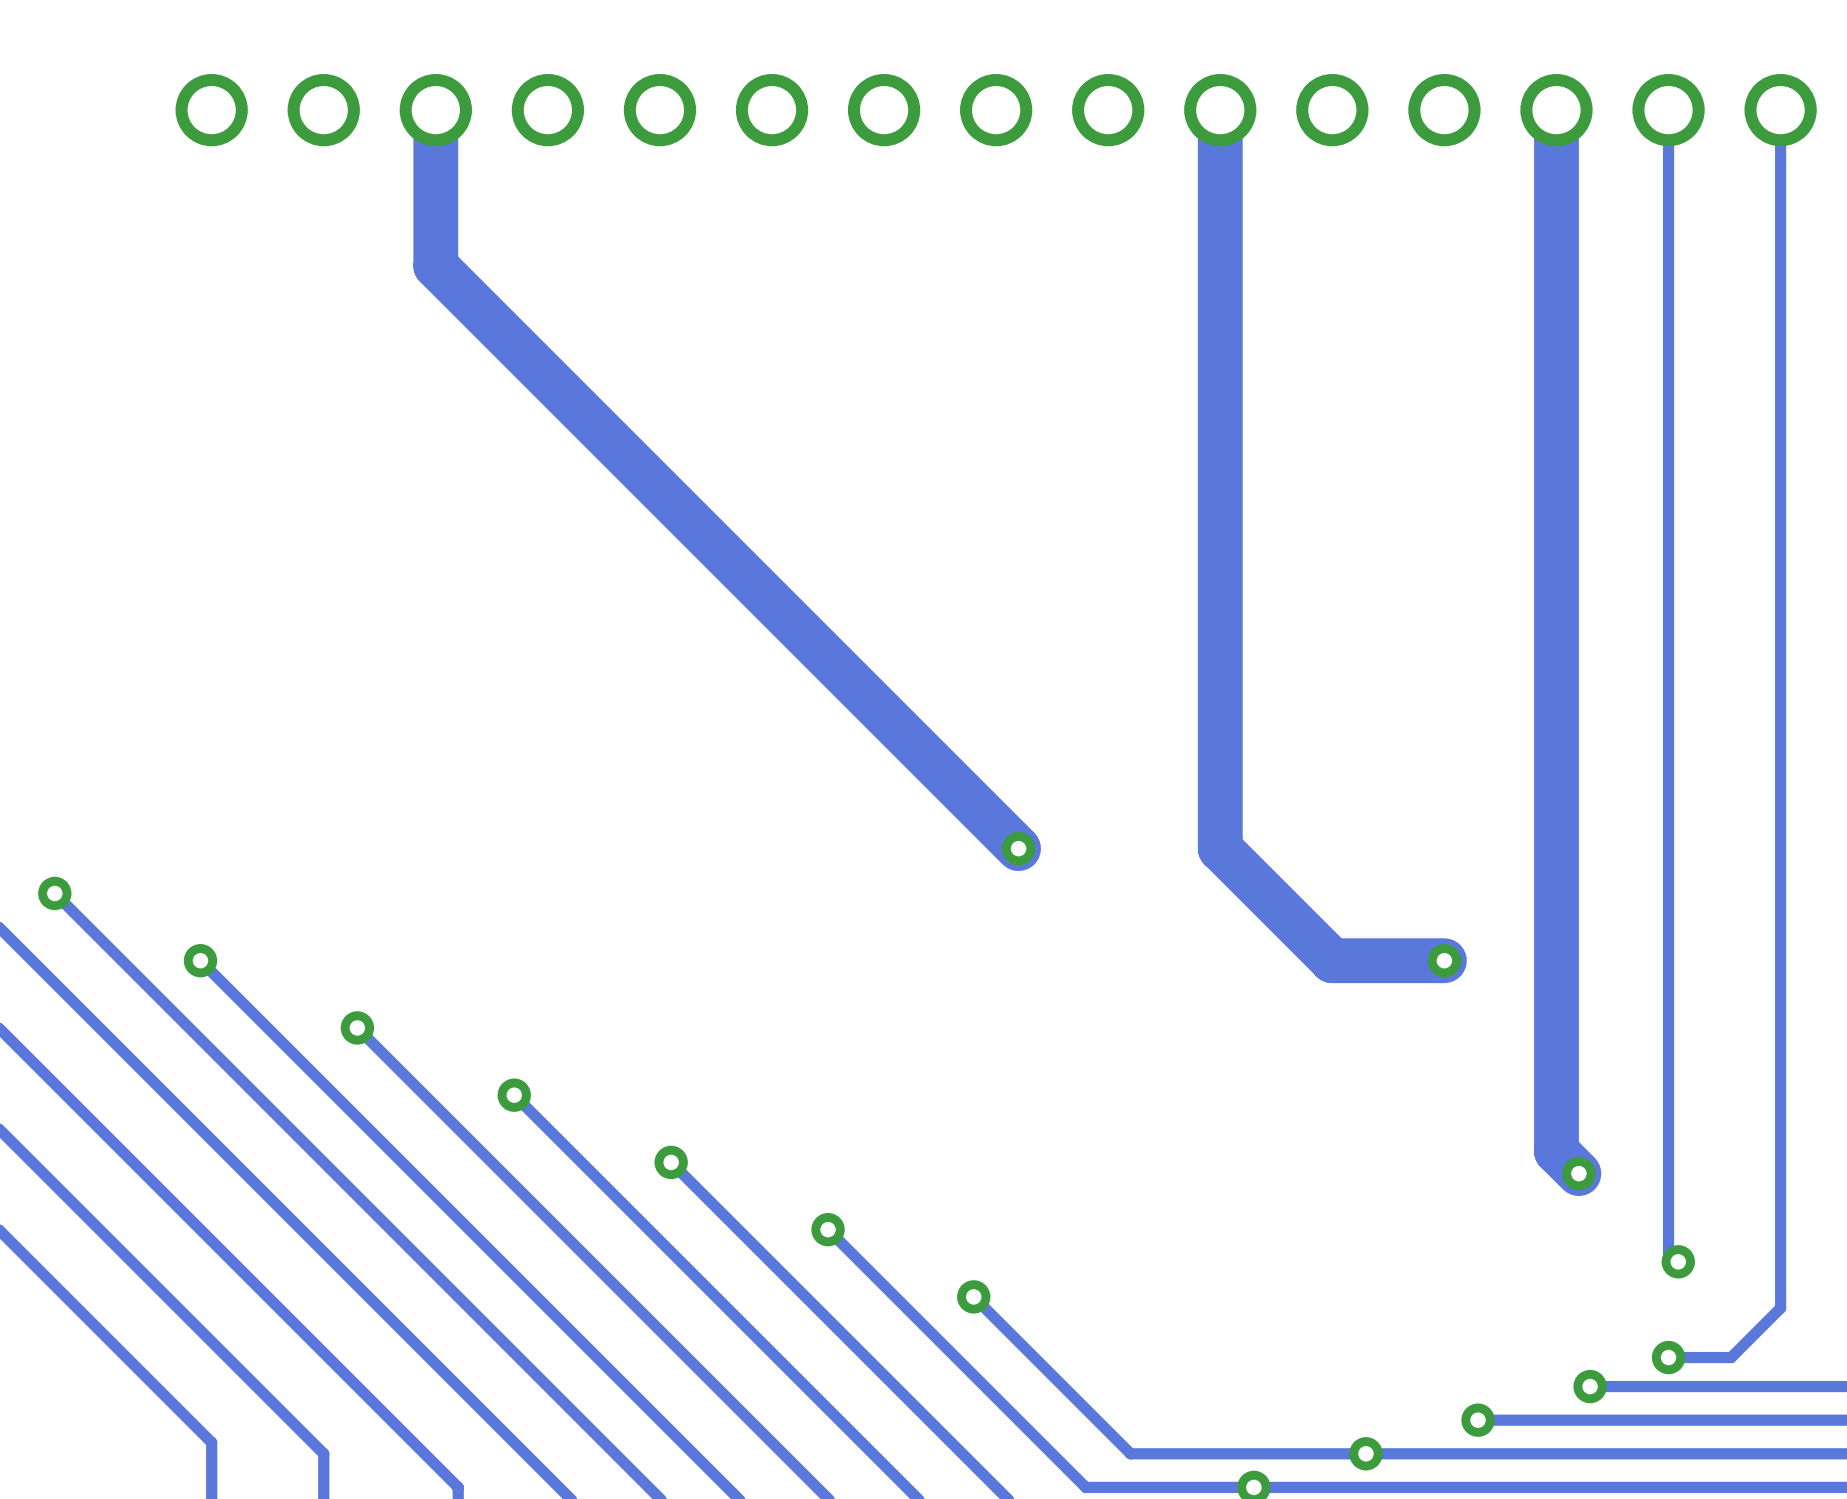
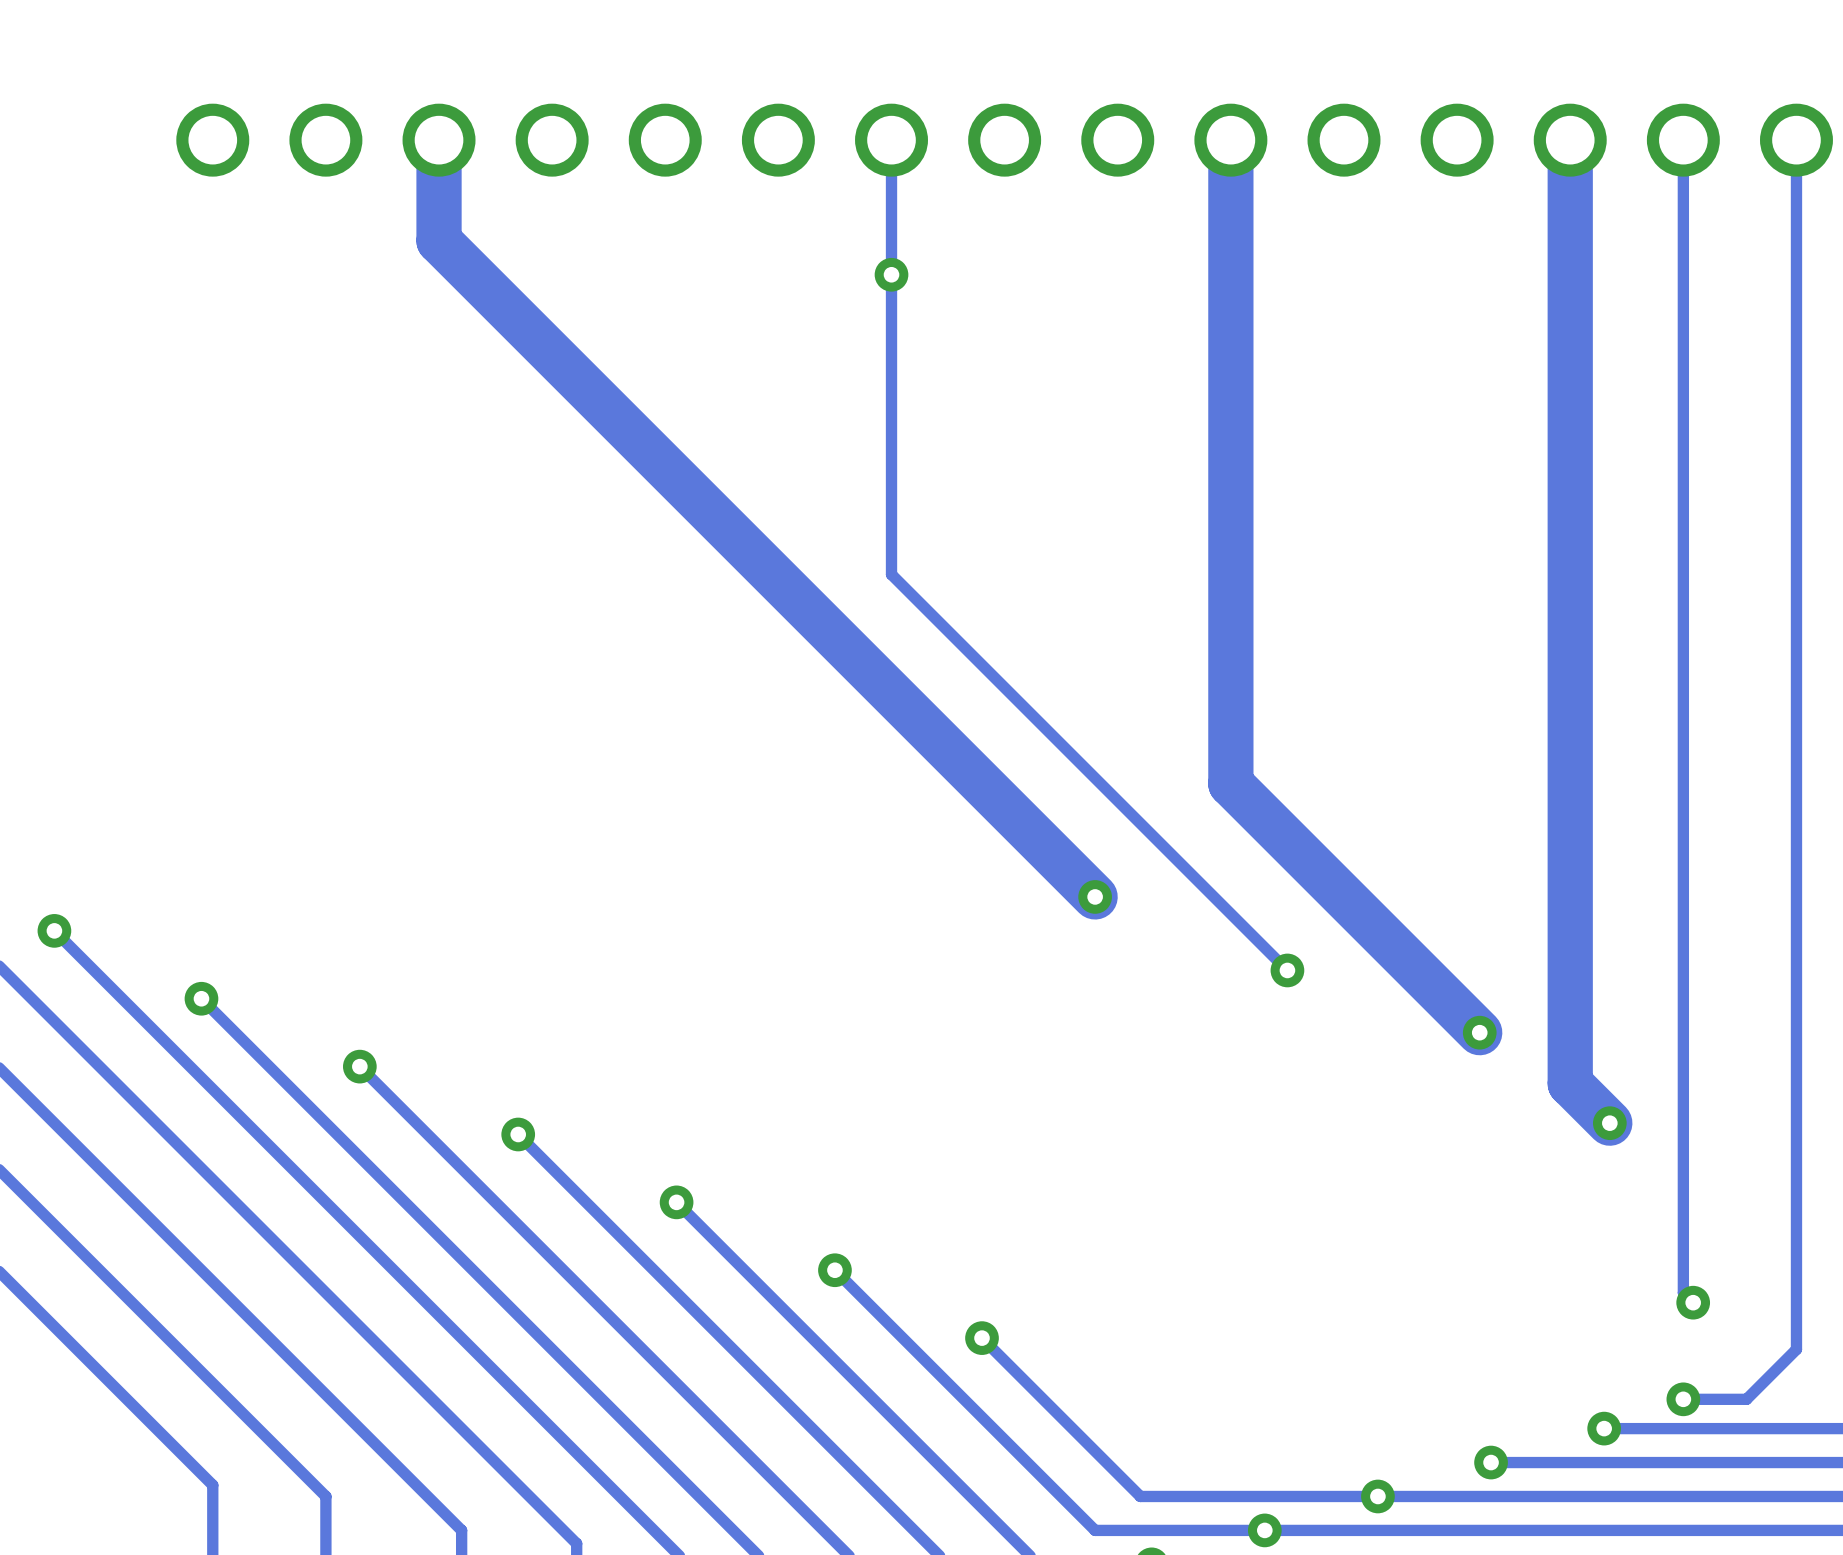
track: none -> (891, 140) (891, 574) (1287, 970)
track: (435, 209) (435, 265) (1018, 848) -> (439, 240) (1095, 896)
via: none -> (891, 274)
track: (1220, 747) (1220, 848) (1332, 960) (1444, 960) -> (1230, 783) (1479, 1032)
via position: (1018, 848) -> (1095, 896)
via: none -> (1287, 970)
via position: (1444, 960) -> (1479, 1032)
track: (1556, 1044) (1556, 1151) (1578, 1173) -> (1570, 1083) (1609, 1123)
via position: (1578, 1173) -> (1609, 1123)

